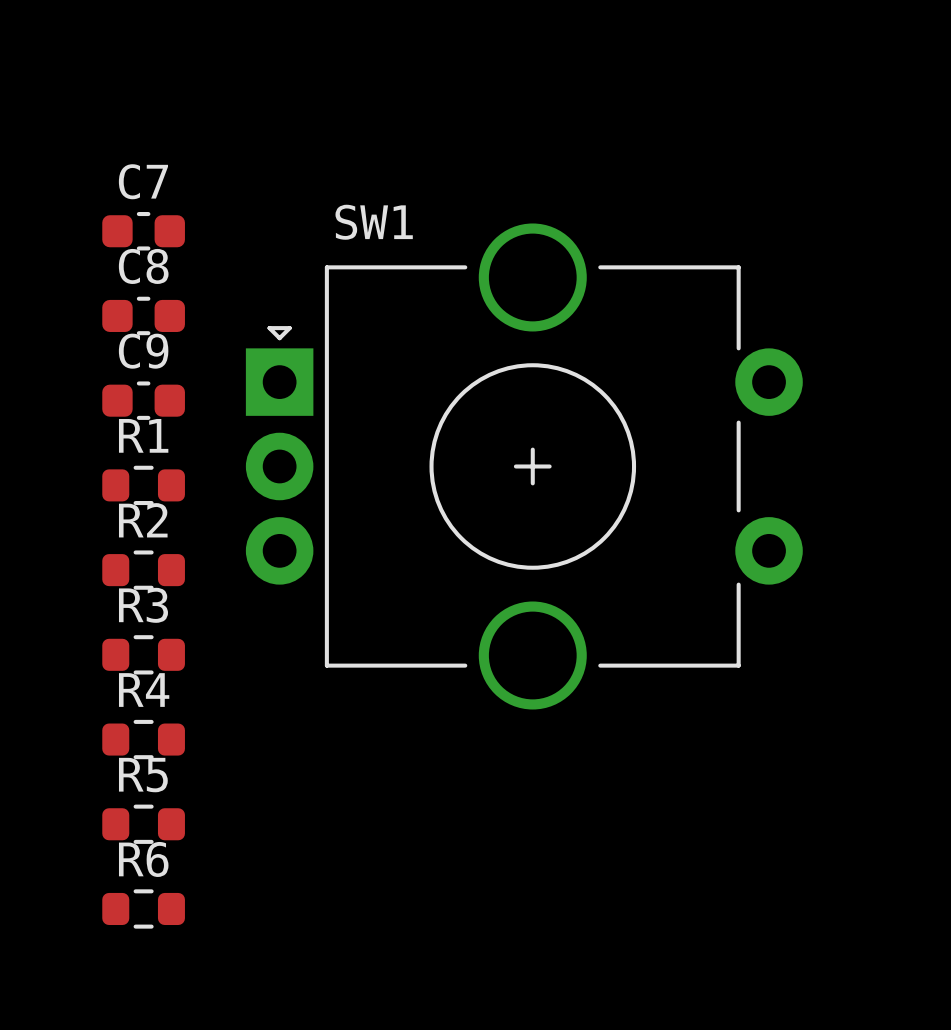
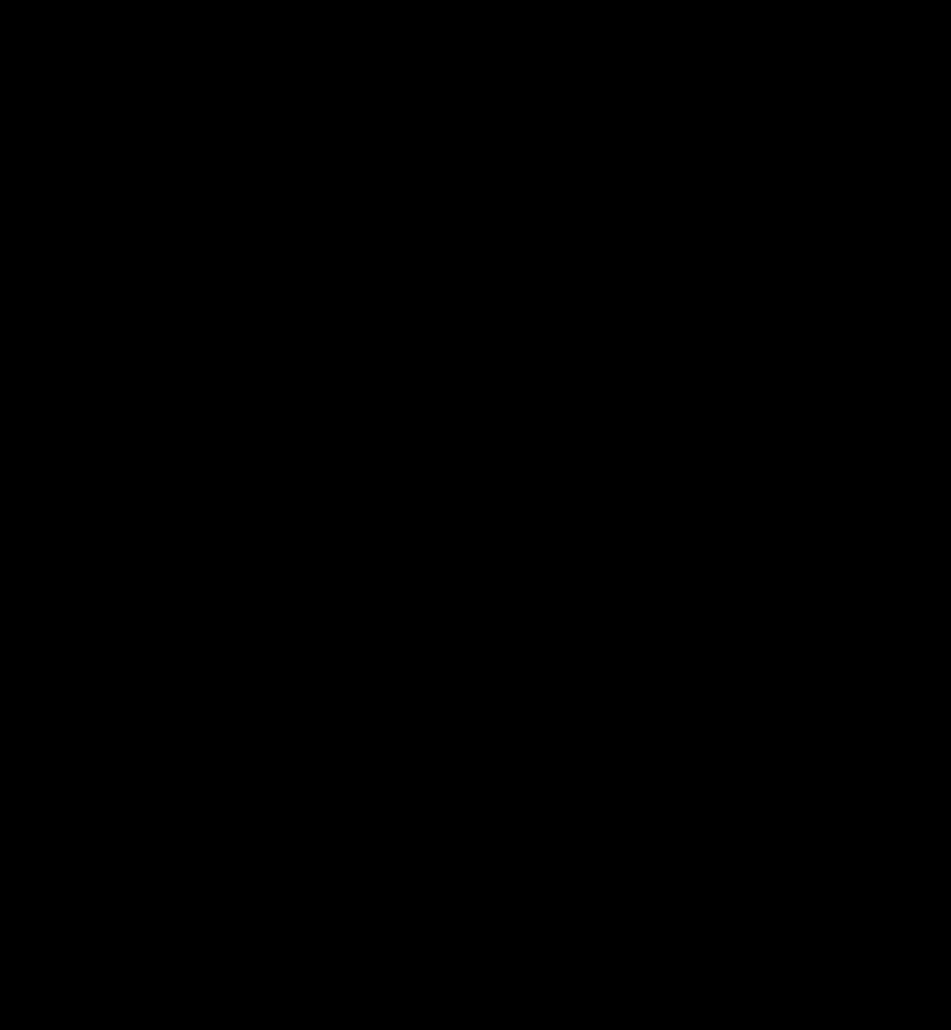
C7: (143, 231) -> none
C8: (143, 315) -> none
C9: (143, 400) -> none
SW1: (524, 466) -> none
R1: (143, 485) -> none
R2: (143, 570) -> none
R3: (143, 654) -> none
R4: (143, 739) -> none
R5: (143, 824) -> none
R6: (143, 908) -> none

